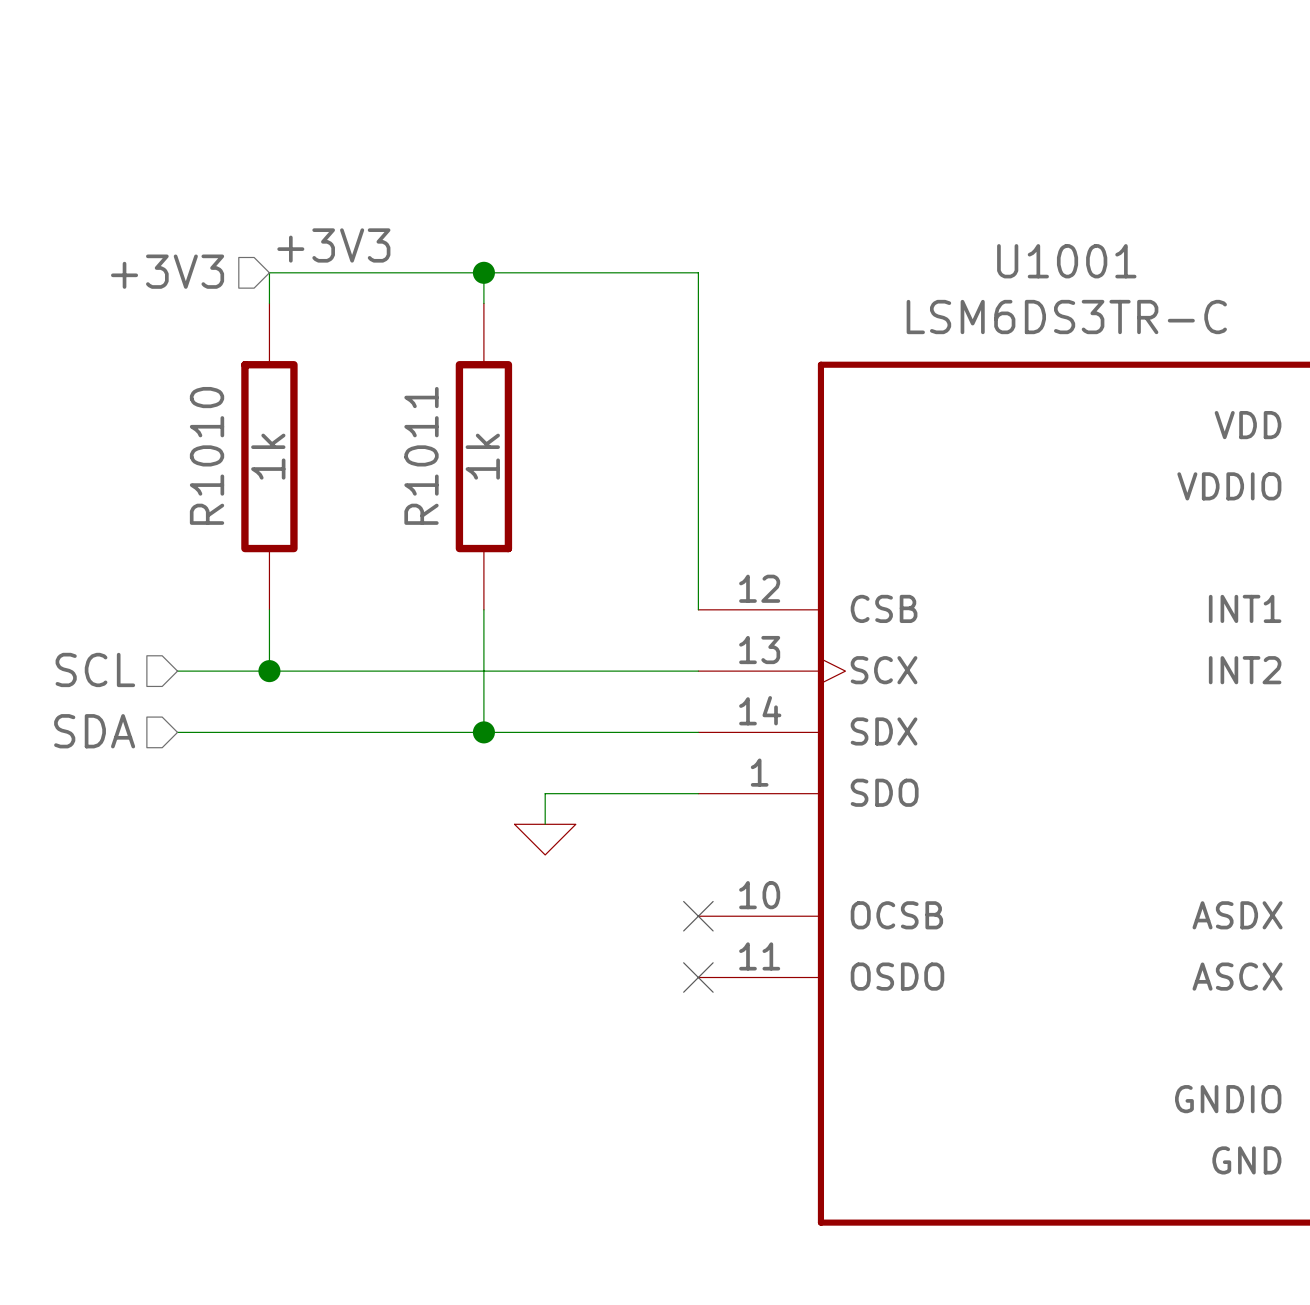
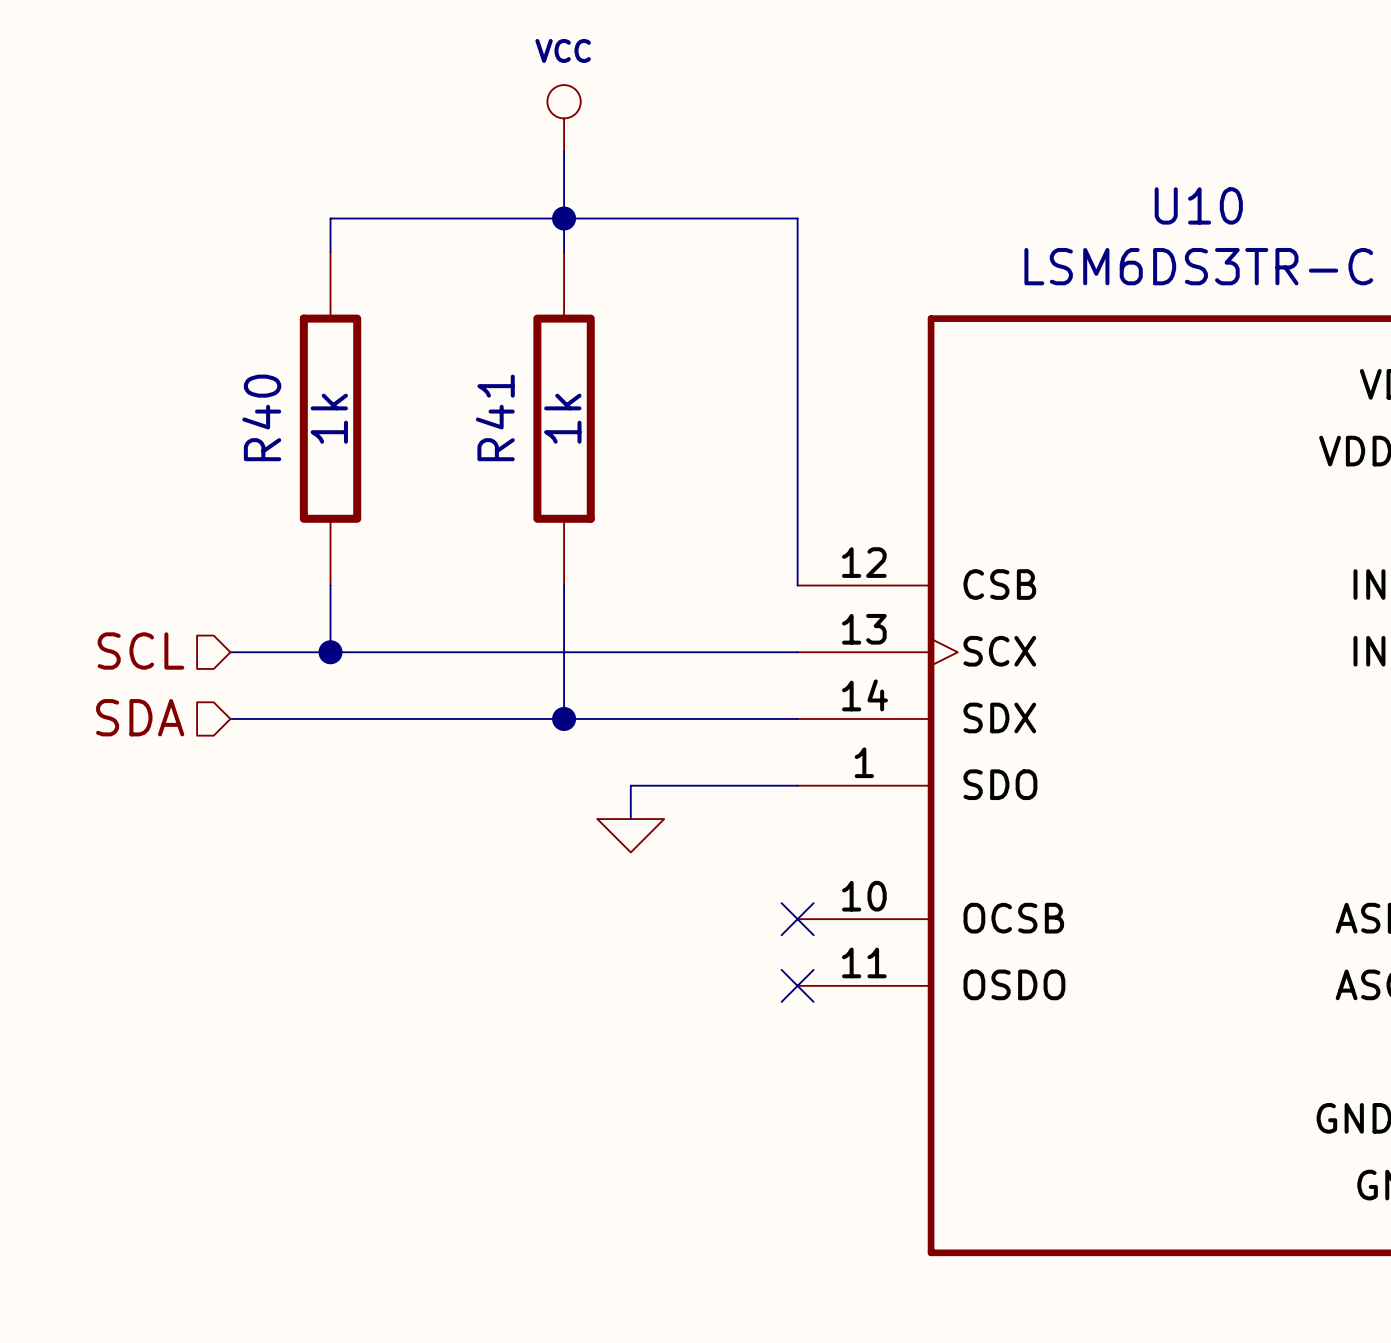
power symbol: none -> VCC (564, 118)
wire: none -> (564, 151) (564, 218)
label: +3V3 (333, 245) -> none
U1001 name: U1001 (1066, 261) -> U10 (1198, 205)
hierarchical label: +3V3 (167, 271) -> none
R1010 name: R1010 (207, 455) -> R40 (261, 417)
R1011 name: R1011 (421, 455) -> R41 (495, 417)

